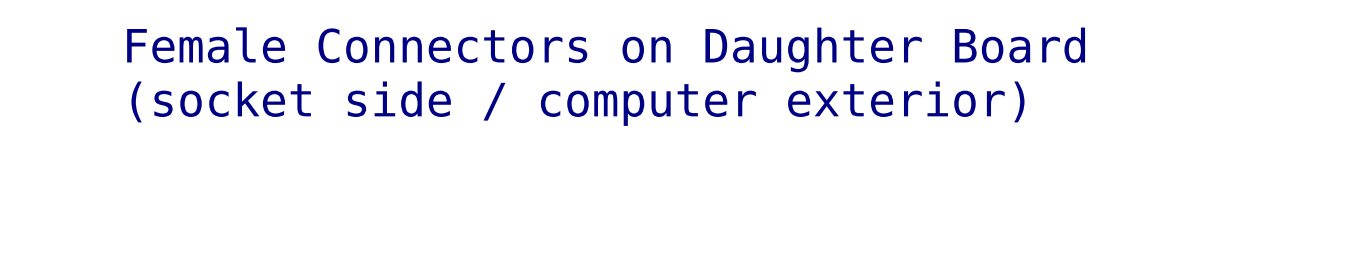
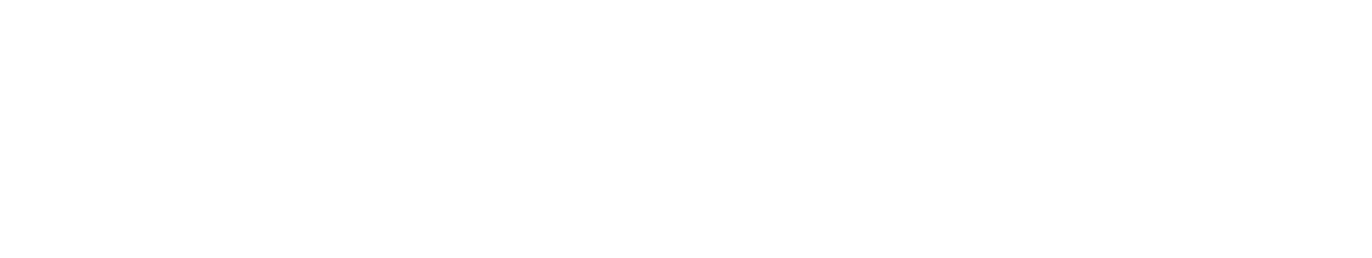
text: Female Connectors on Daughter Board (606, 49) -> none
text: (socket side / computer exterior) (577, 103) -> none

